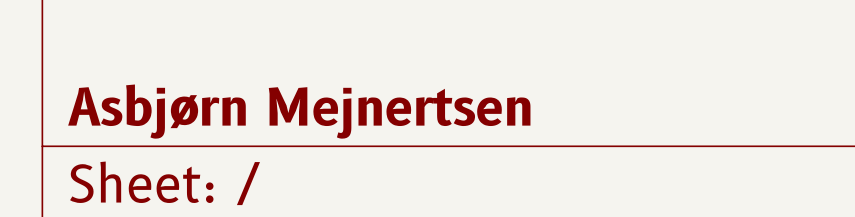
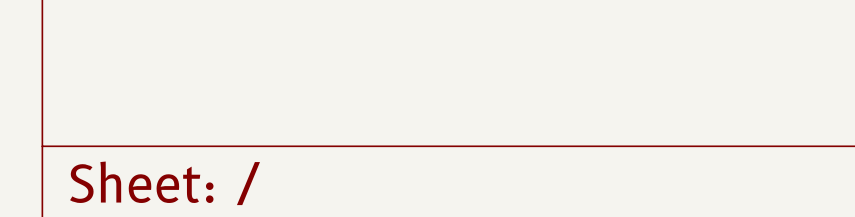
title block: Asbjørn Mejnertsen (299, 111) -> none

